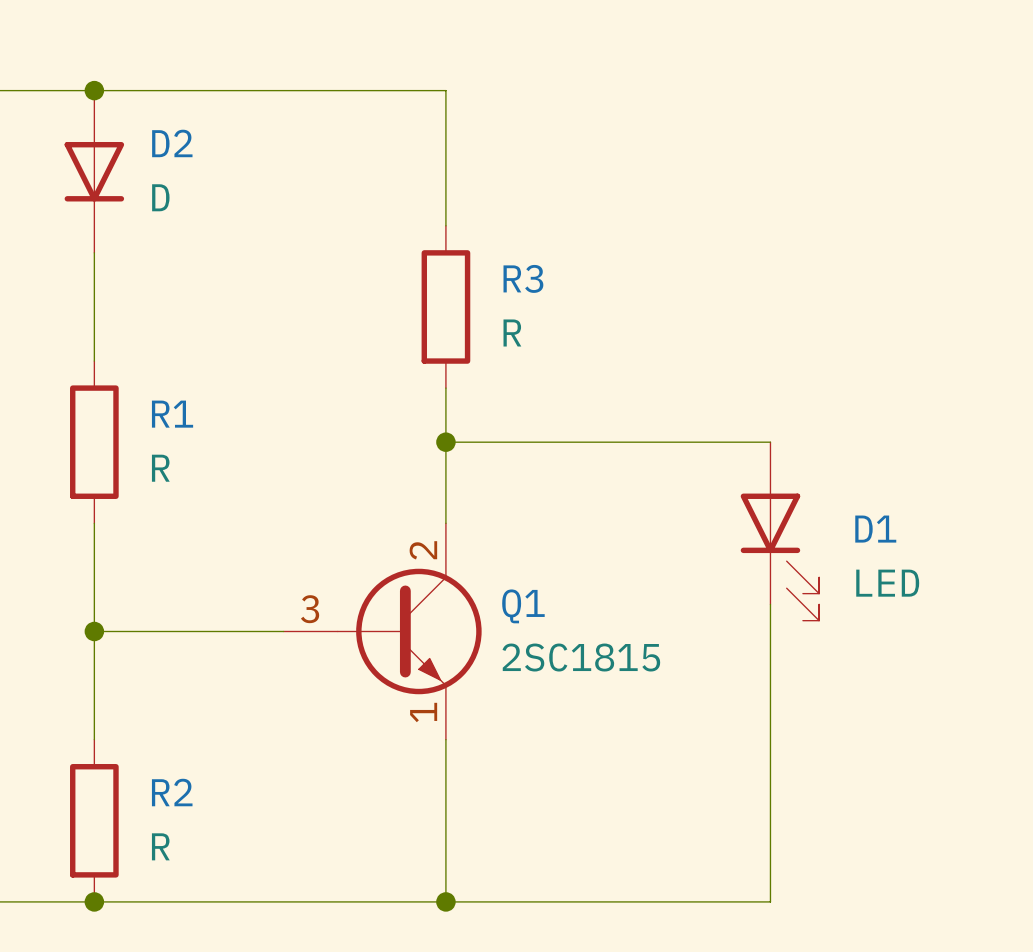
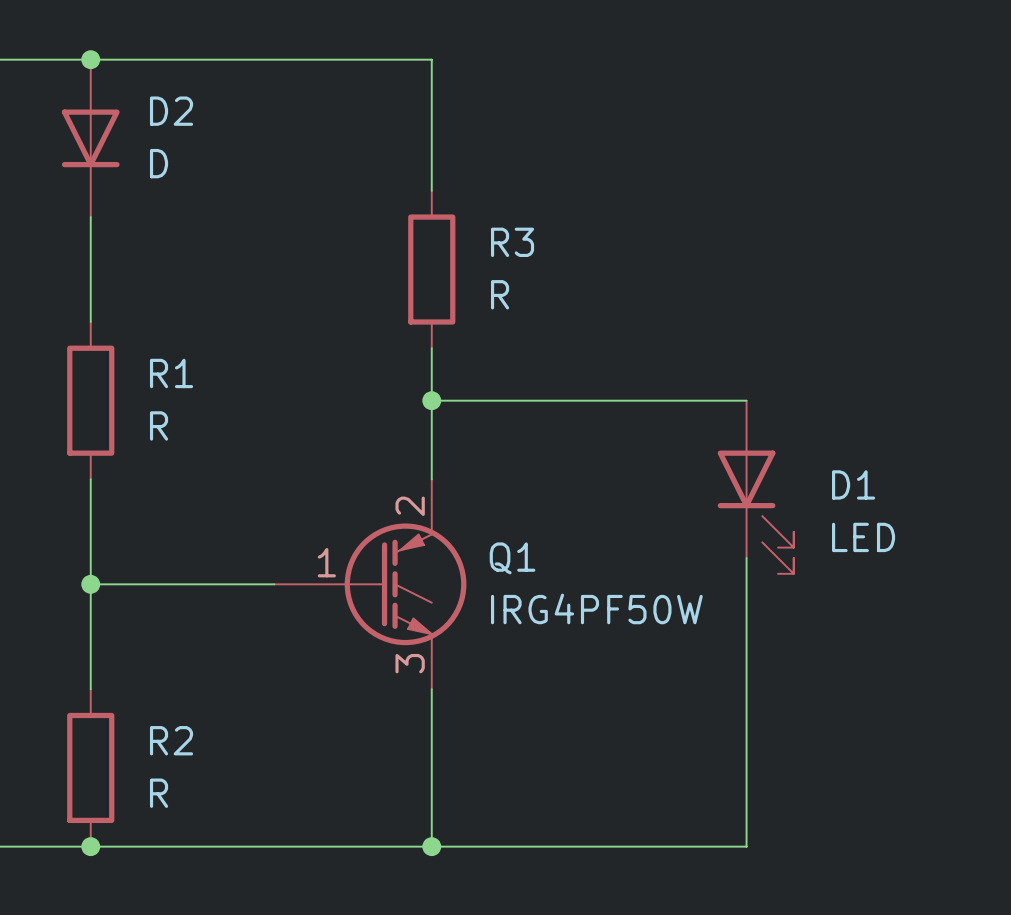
Q1 symbol: [283, 523, 482, 740] -> [274, 479, 467, 690]
Q1 value: 2SC1815 (581, 657) -> IRG4PF50W (596, 608)

